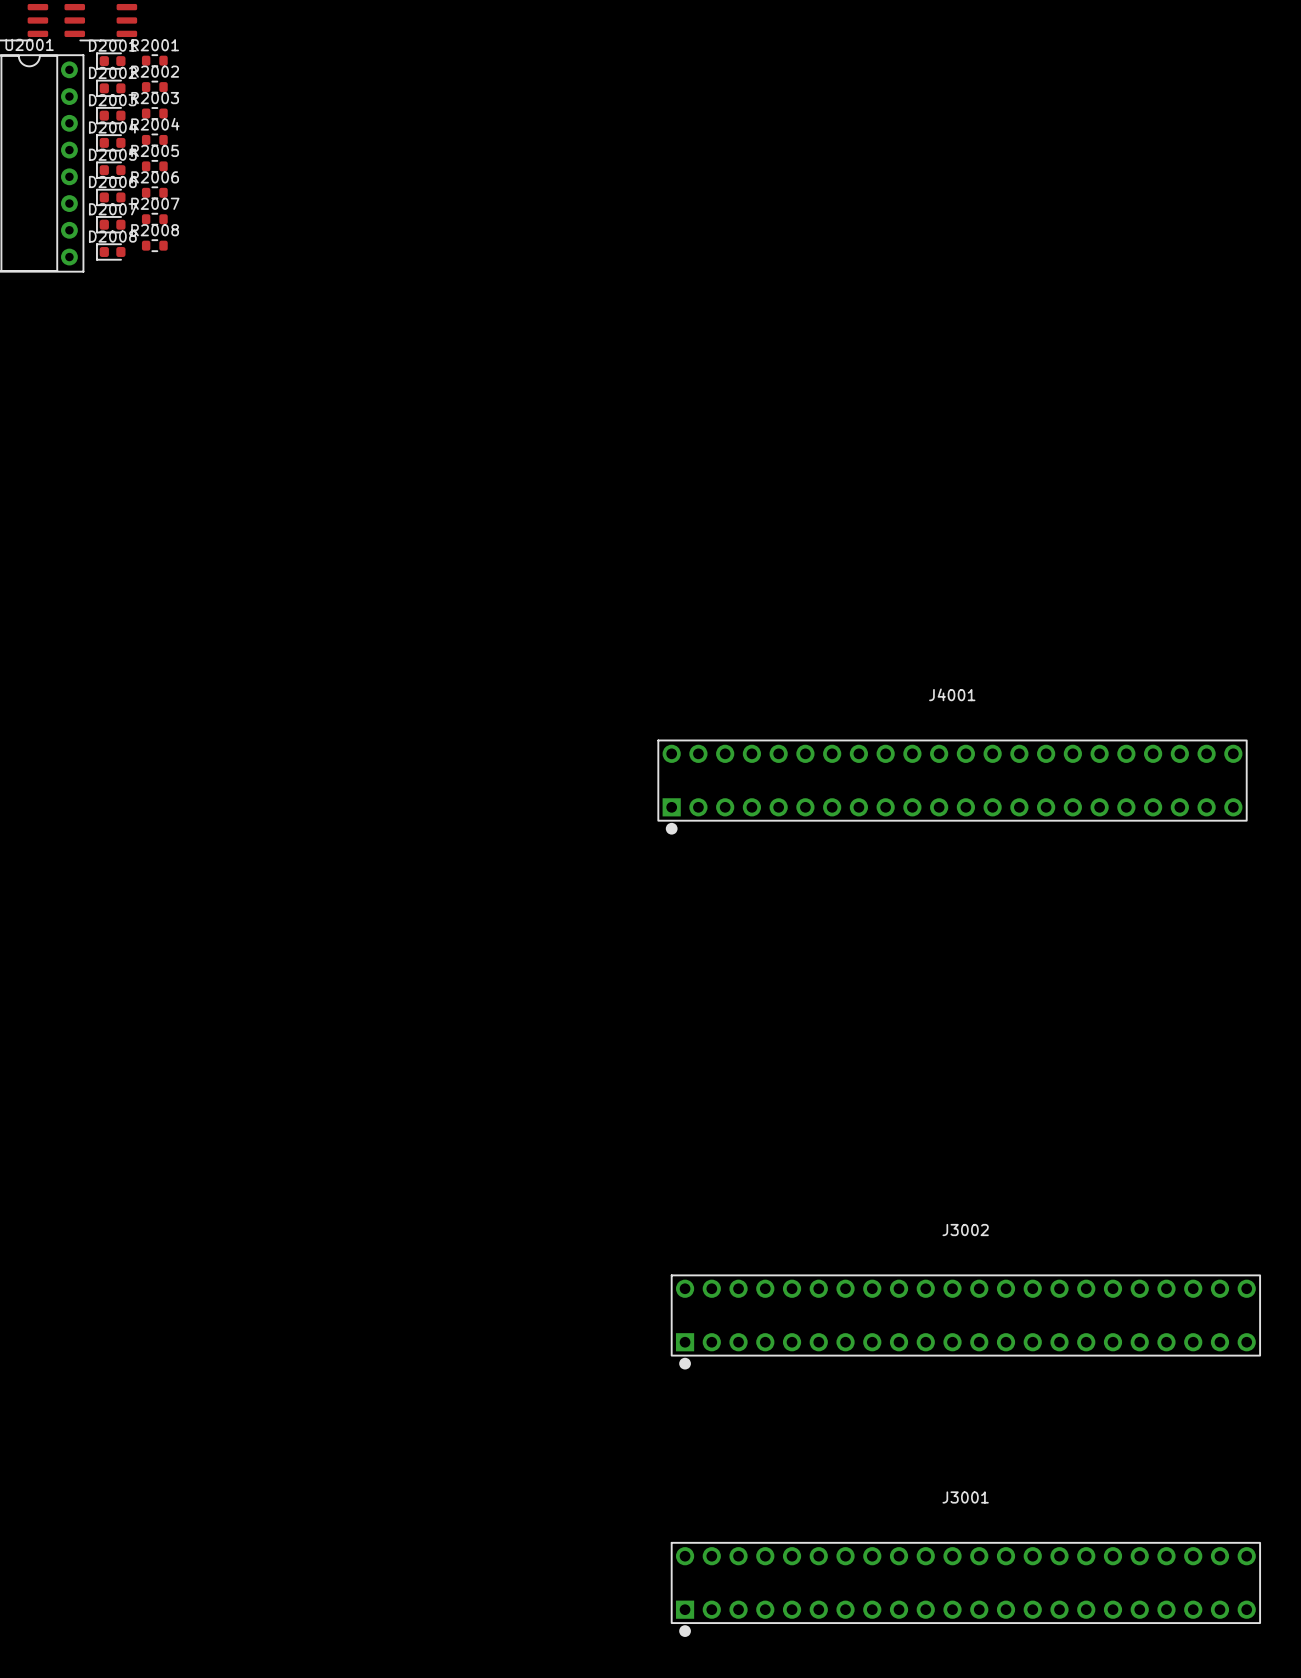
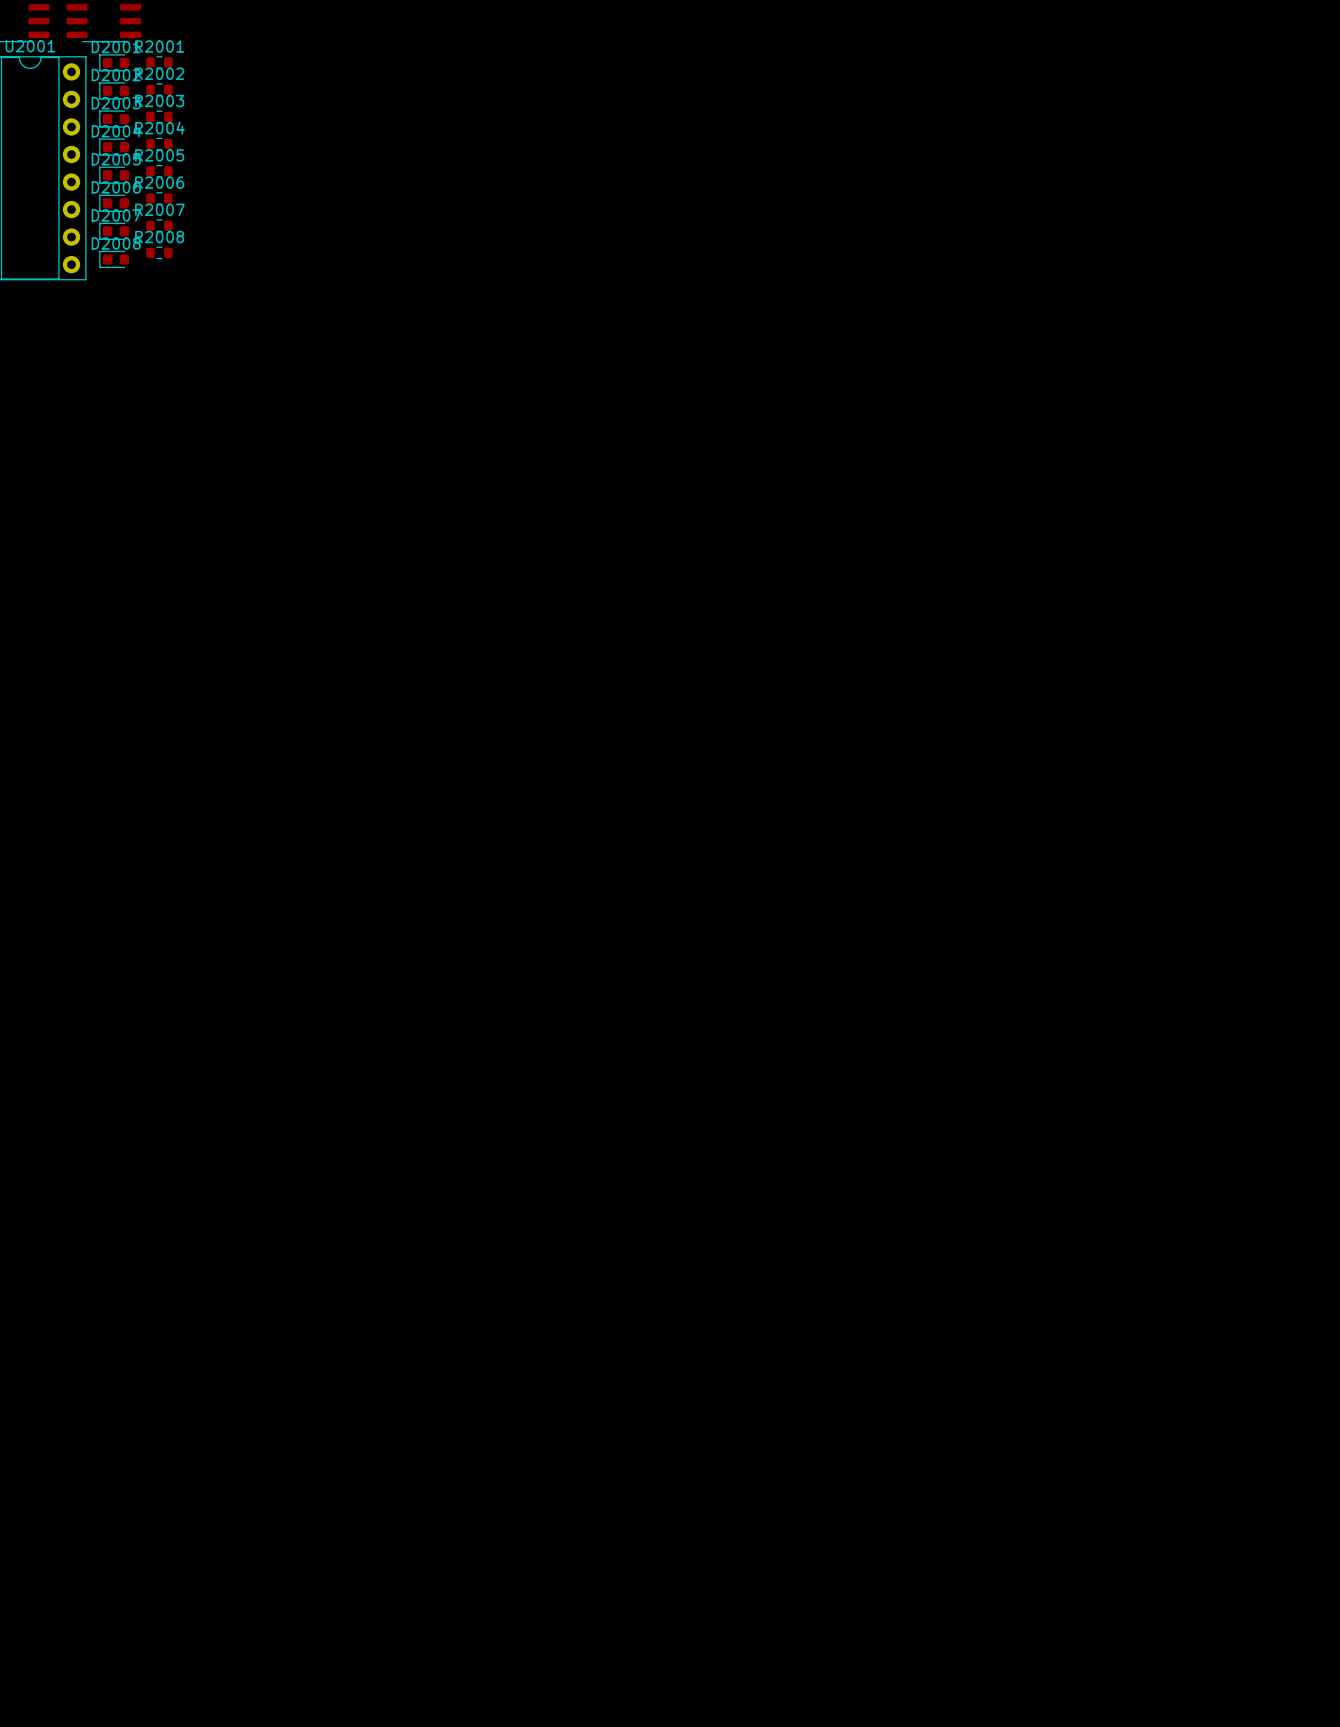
J4001: (952, 787) -> none
J3002: (965, 1322) -> none
J3001: (965, 1589) -> none

